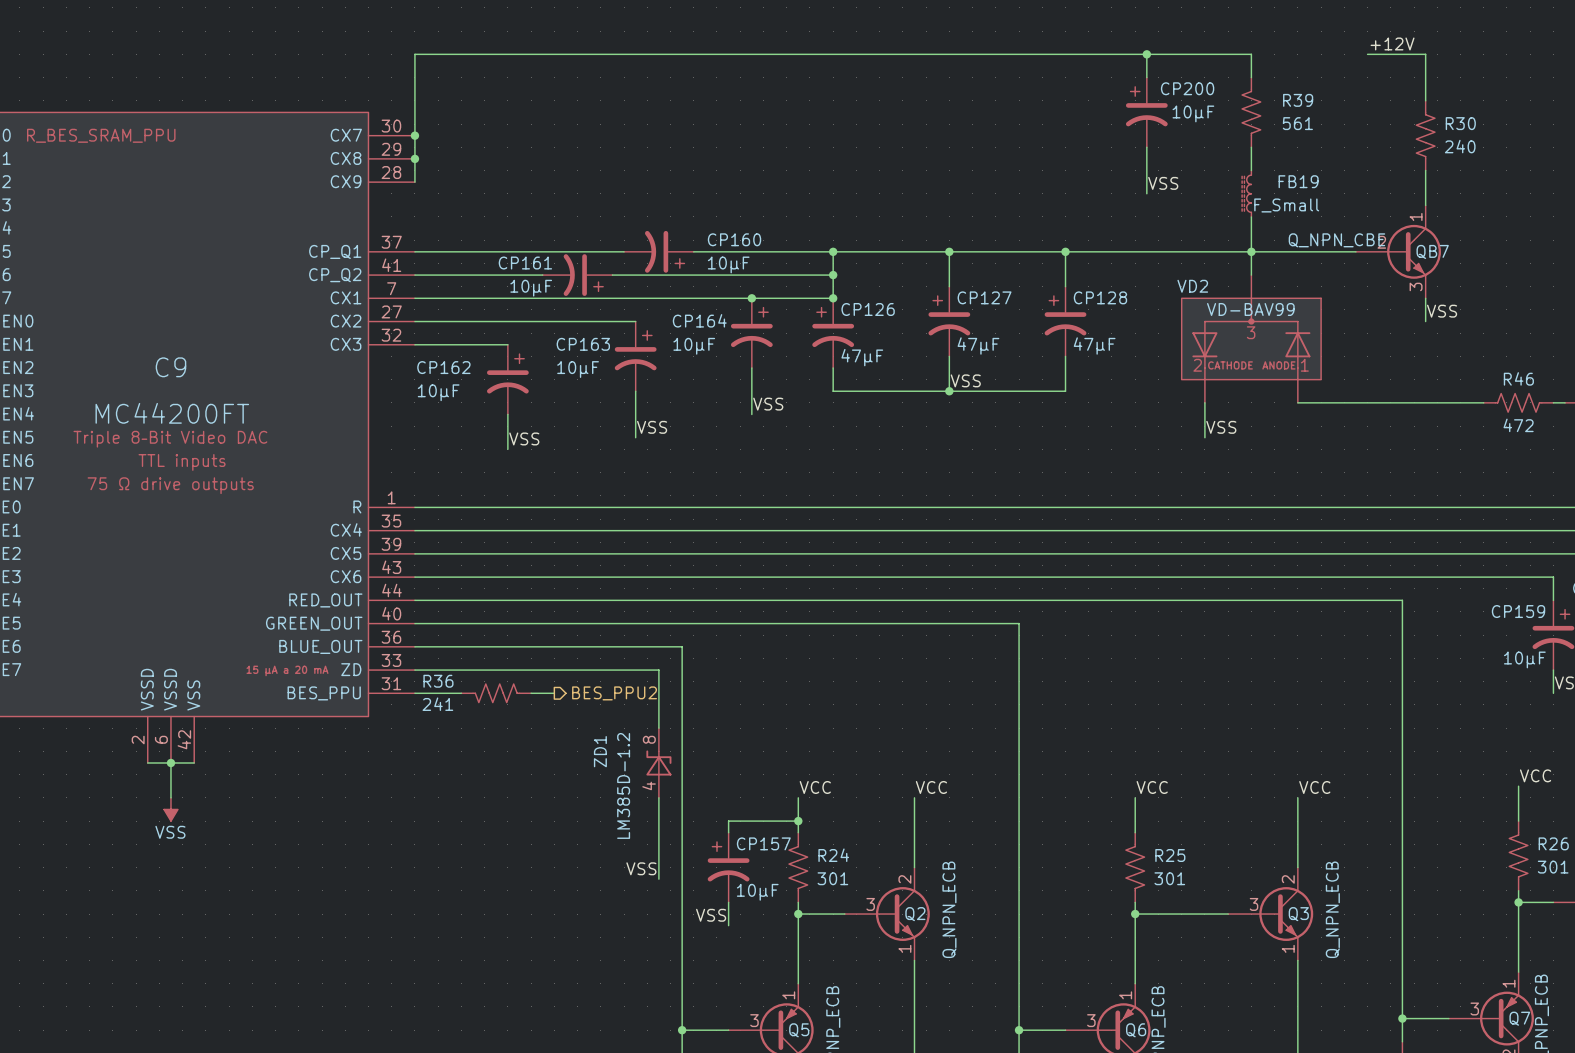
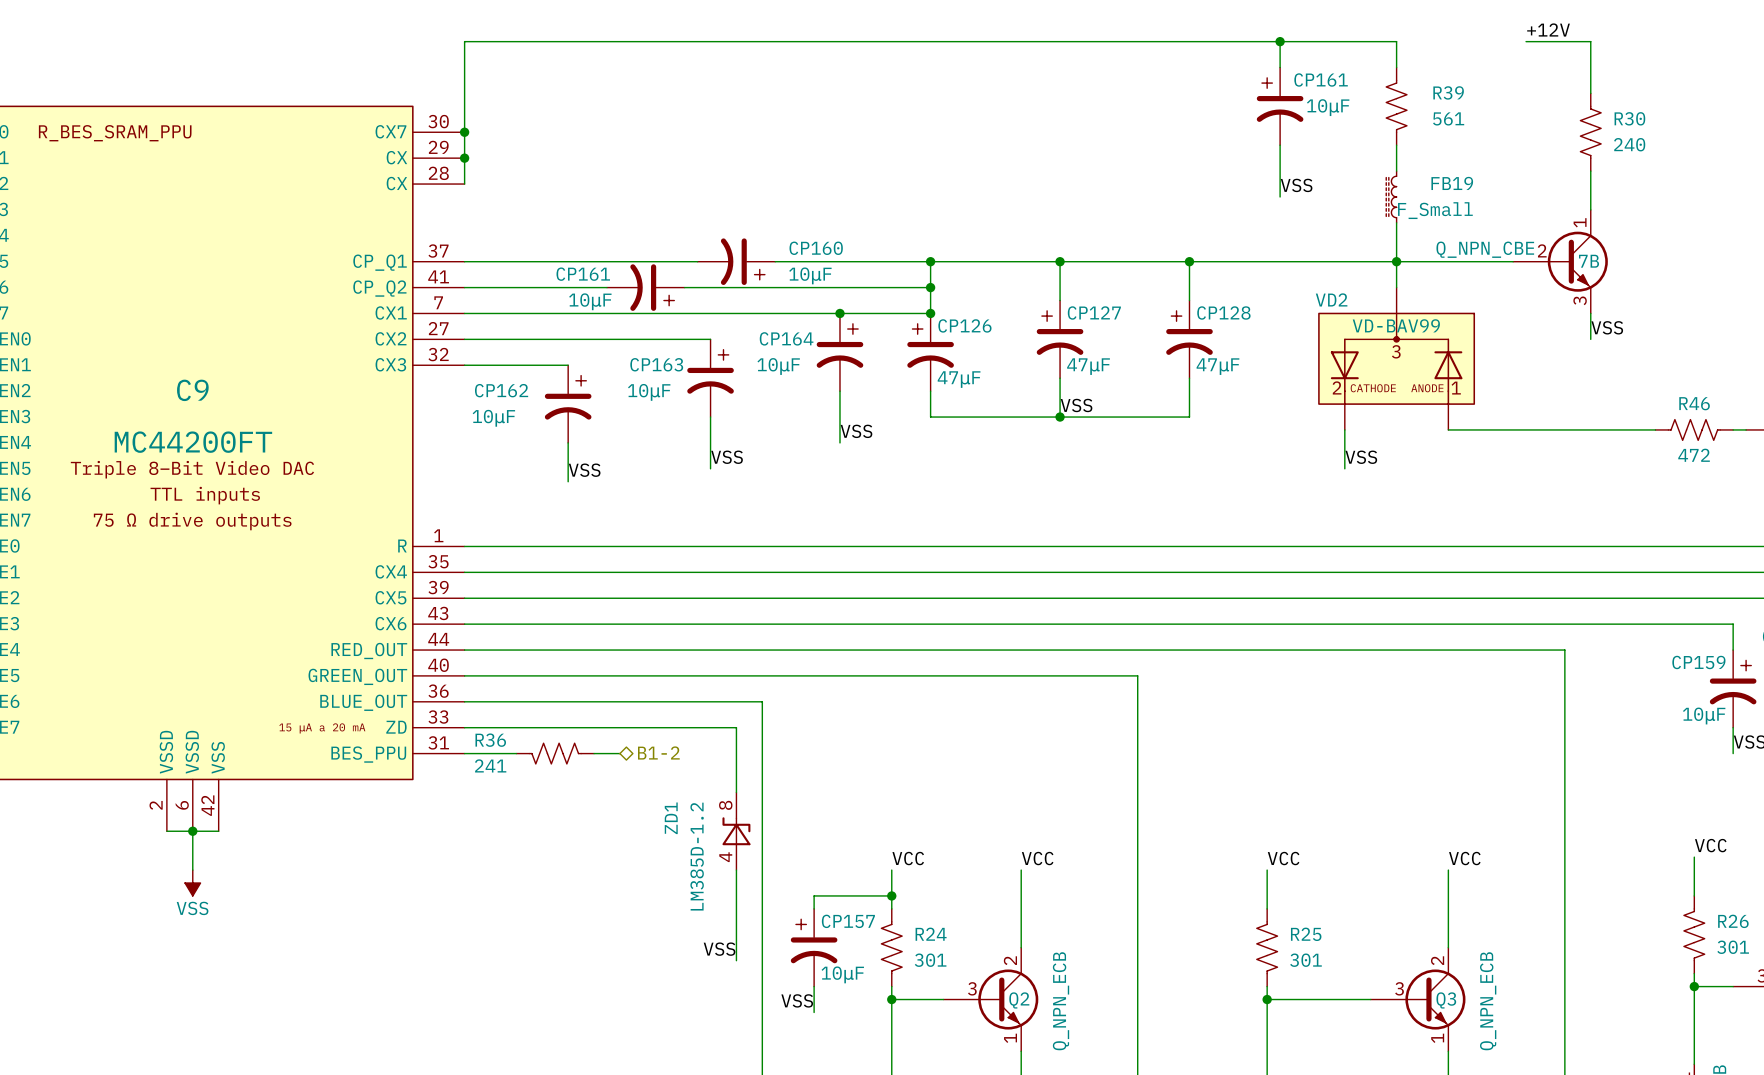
CP200 name: CP200 (1187, 88) -> CP161 (1321, 79)
C9 pin name: CX8 (346, 158) -> CX (396, 157)
C9 pin name: CX9 (346, 181) -> CX (396, 183)
QB7 name: QB7 (1432, 251) -> 7B (1589, 261)
hierarchical label shape: output (614, 693) -> bidirectional (658, 752)
hierarchical label: BES_PPU2 (614, 693) -> B1-2 (658, 752)

